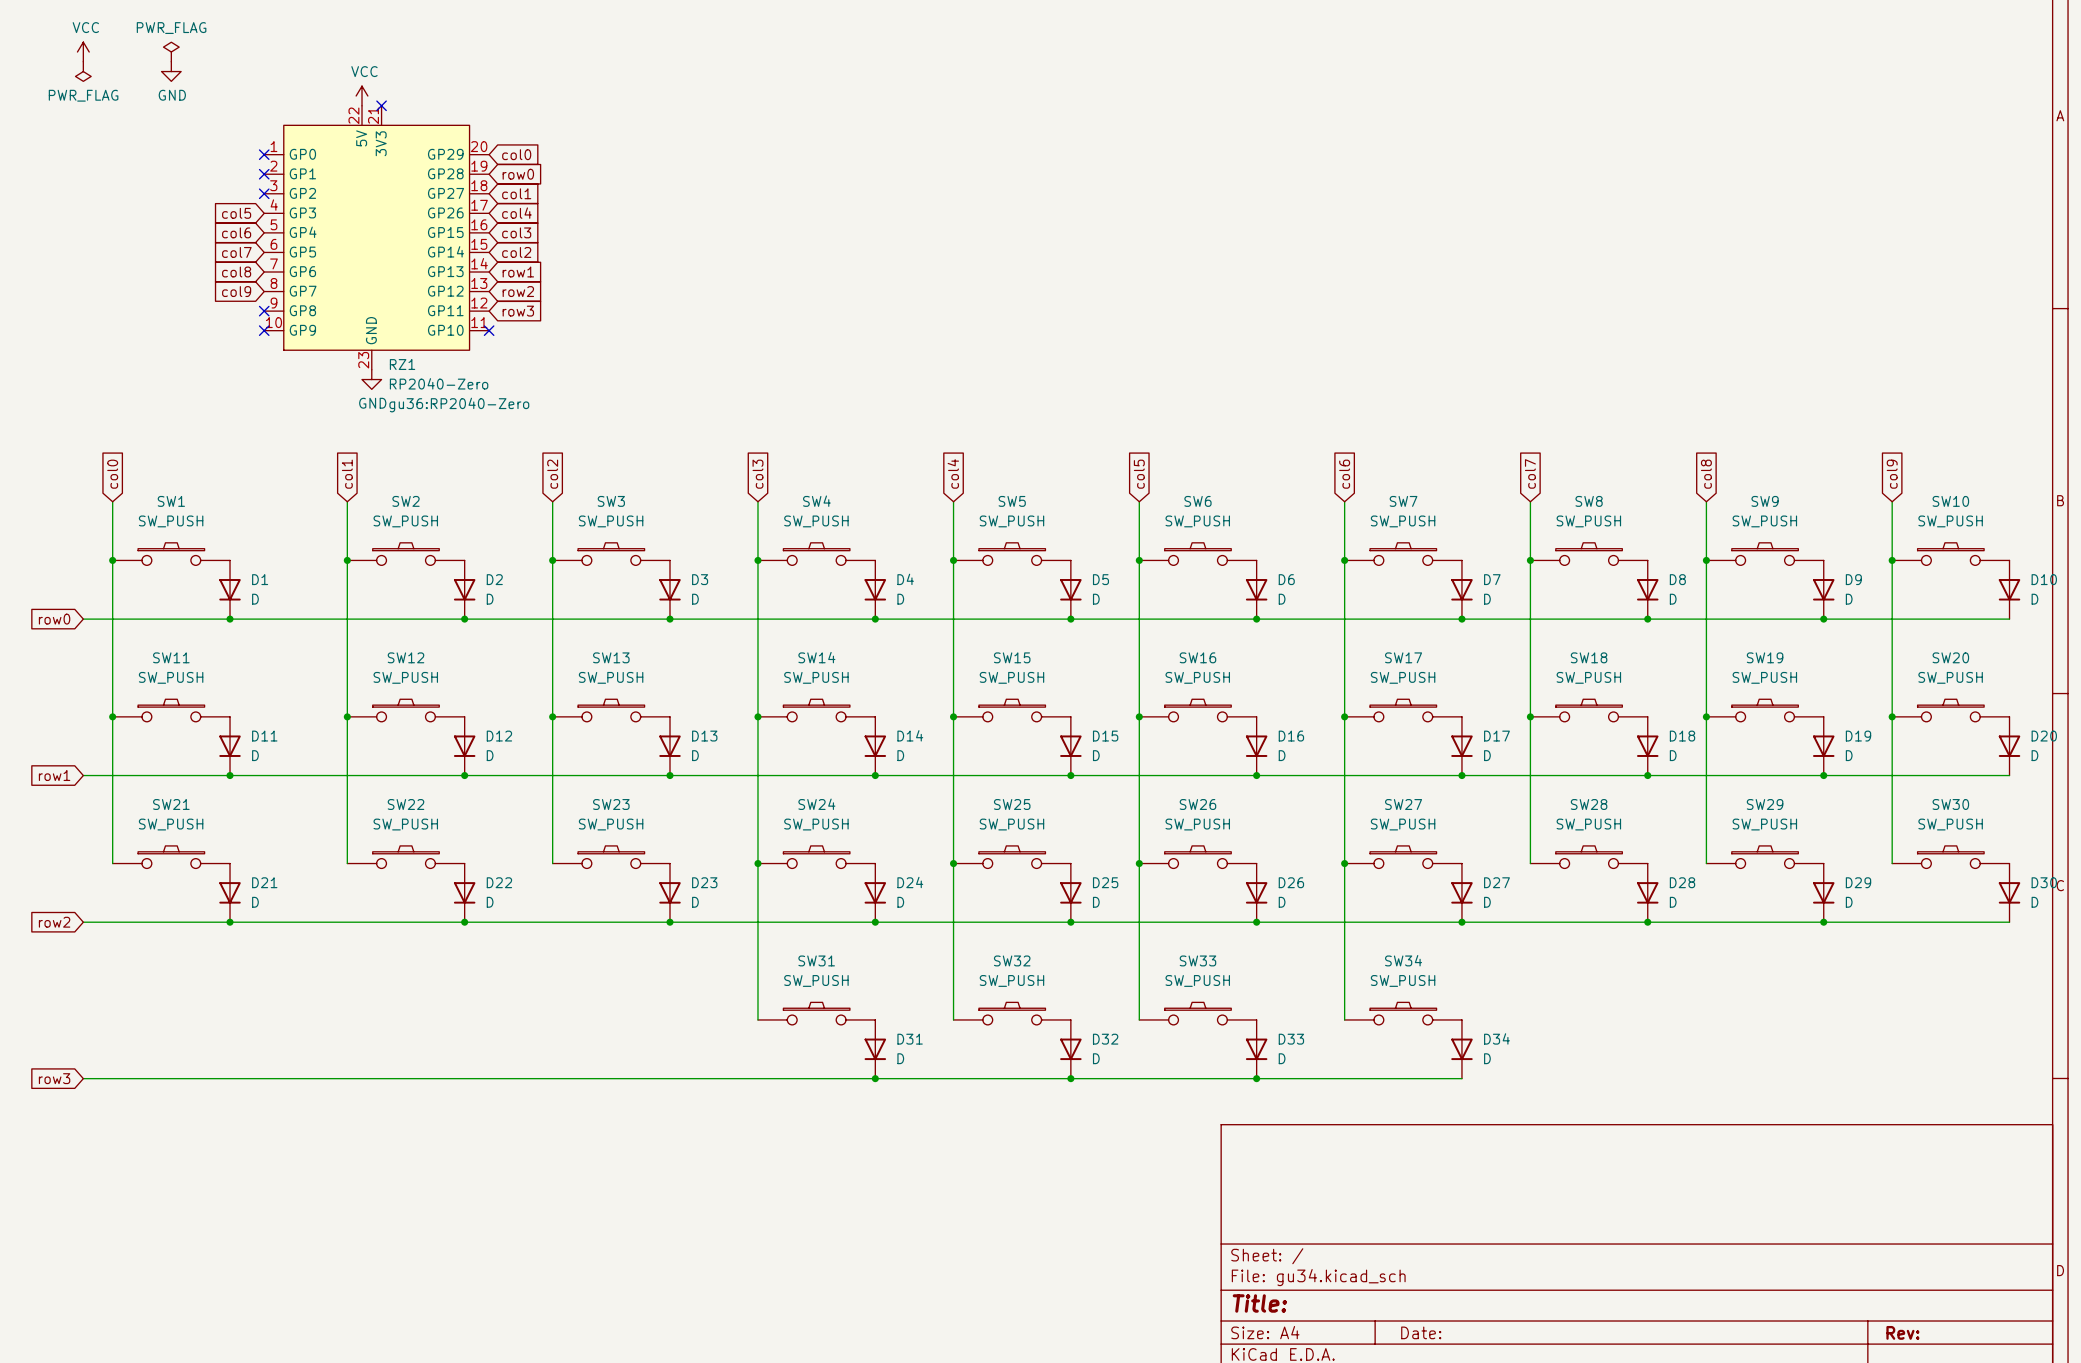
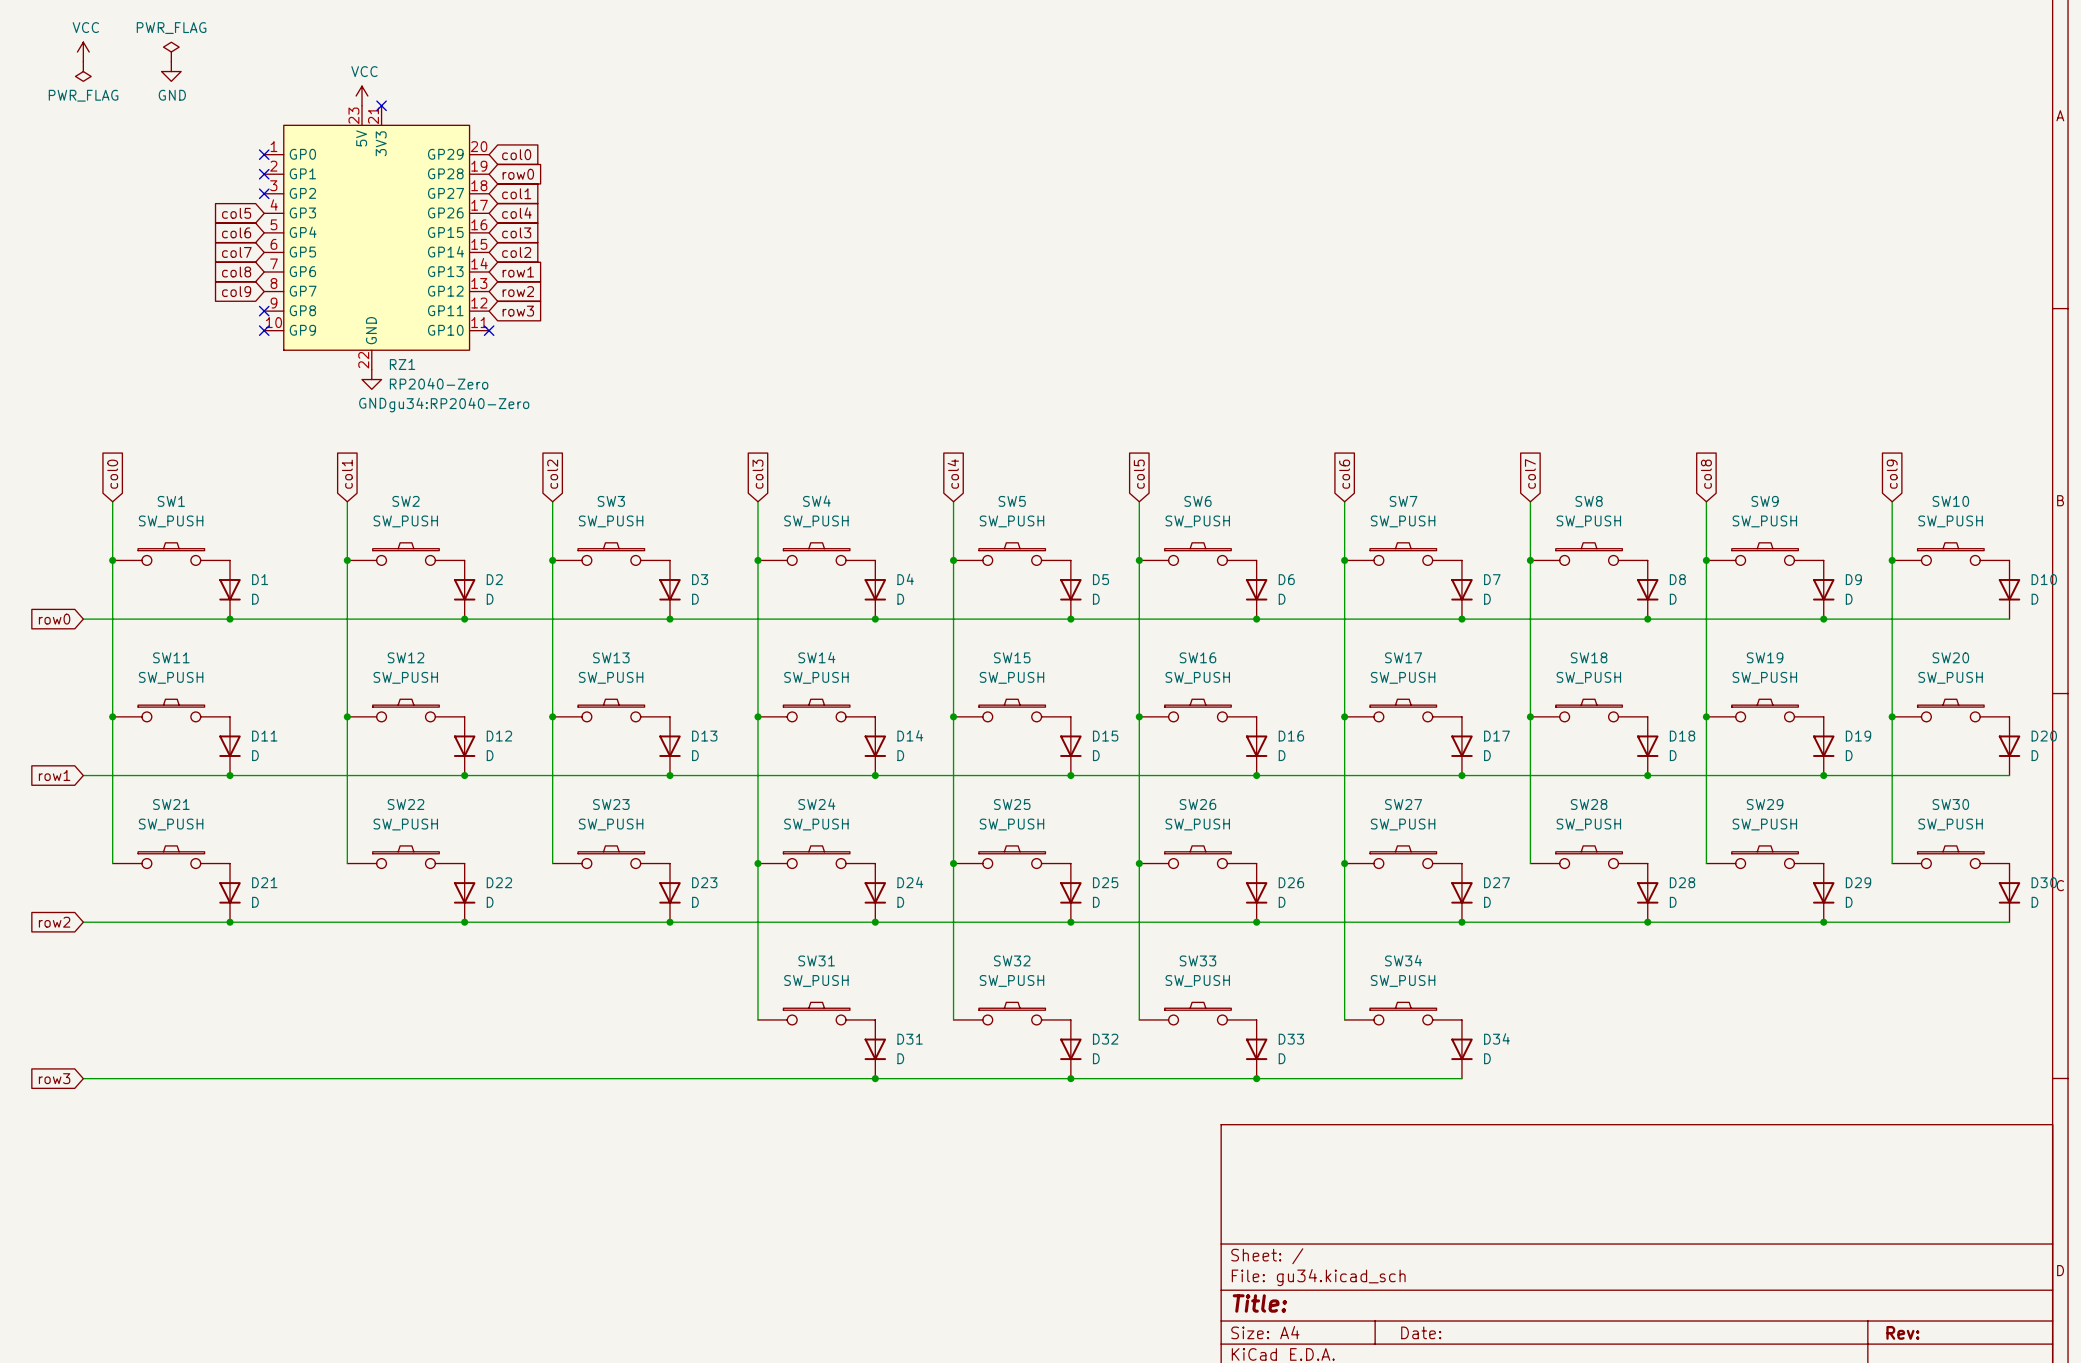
RZ1 pin number: 22 (353, 115) -> 23 (353, 115)
RZ1 pin number: 23 (363, 360) -> 22 (363, 360)
RZ1 text: gu36:RP2040-Zero (459, 405) -> gu34:RP2040-Zero (459, 405)

